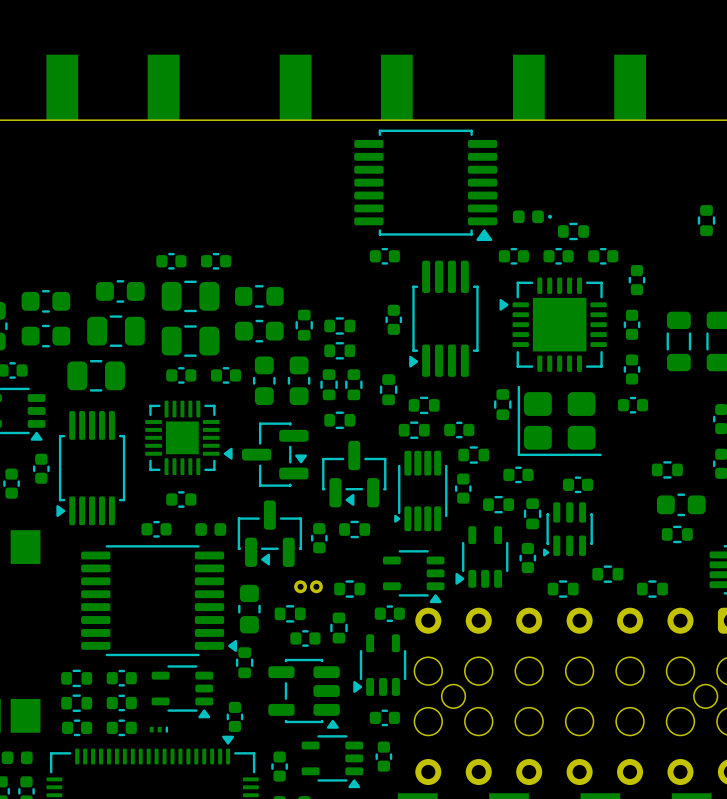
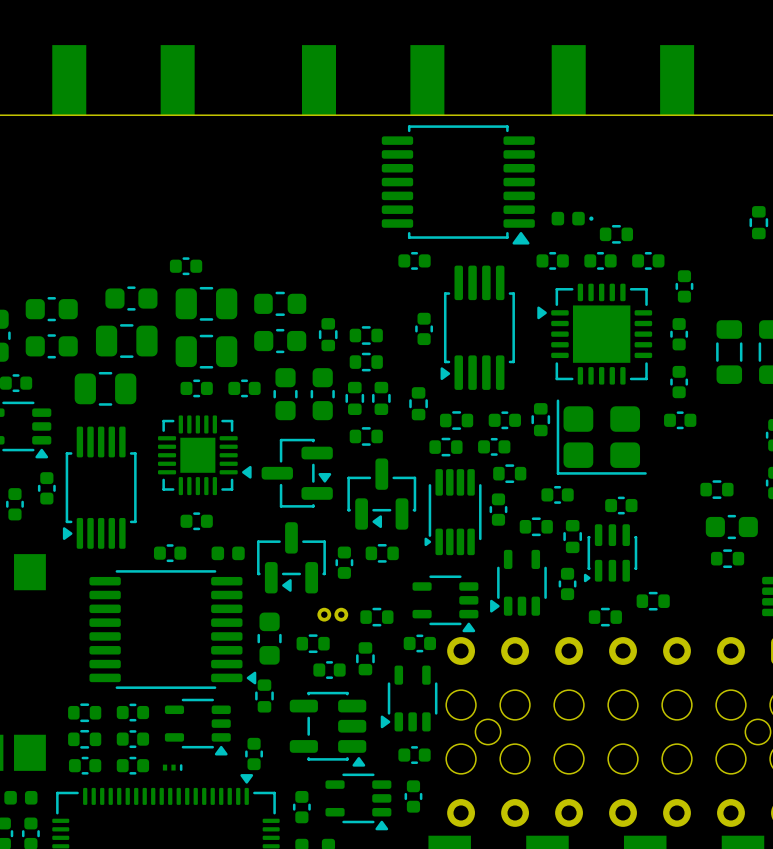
part position: (216, 261) -> (504, 420)
part: (652, 589) -> none

